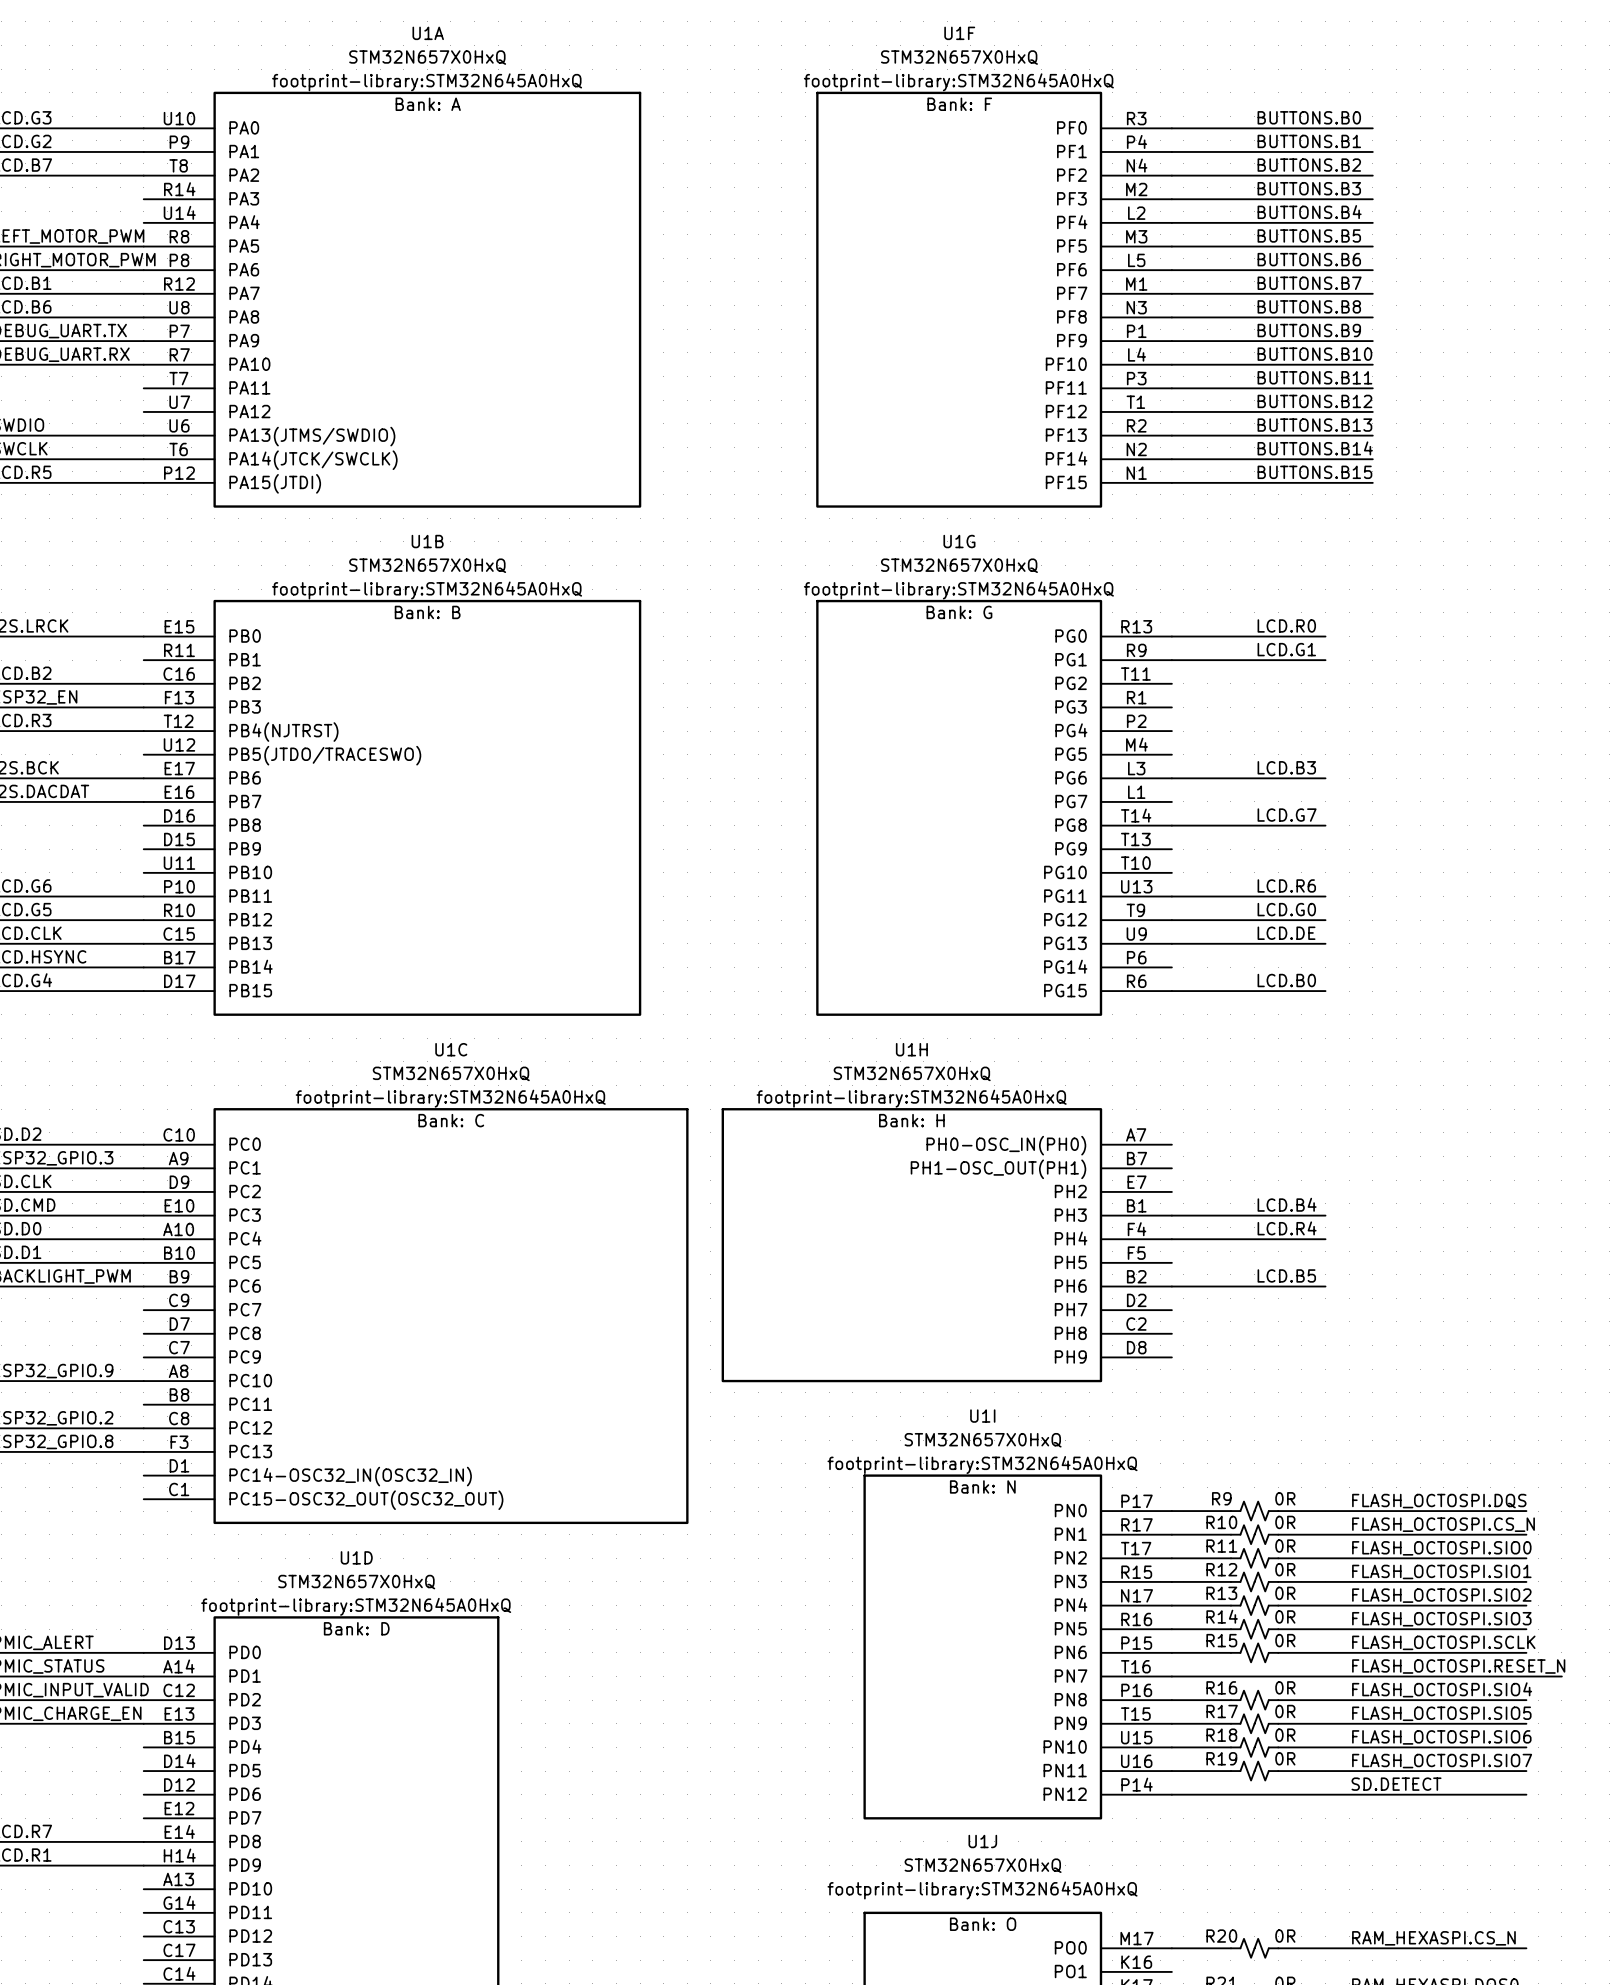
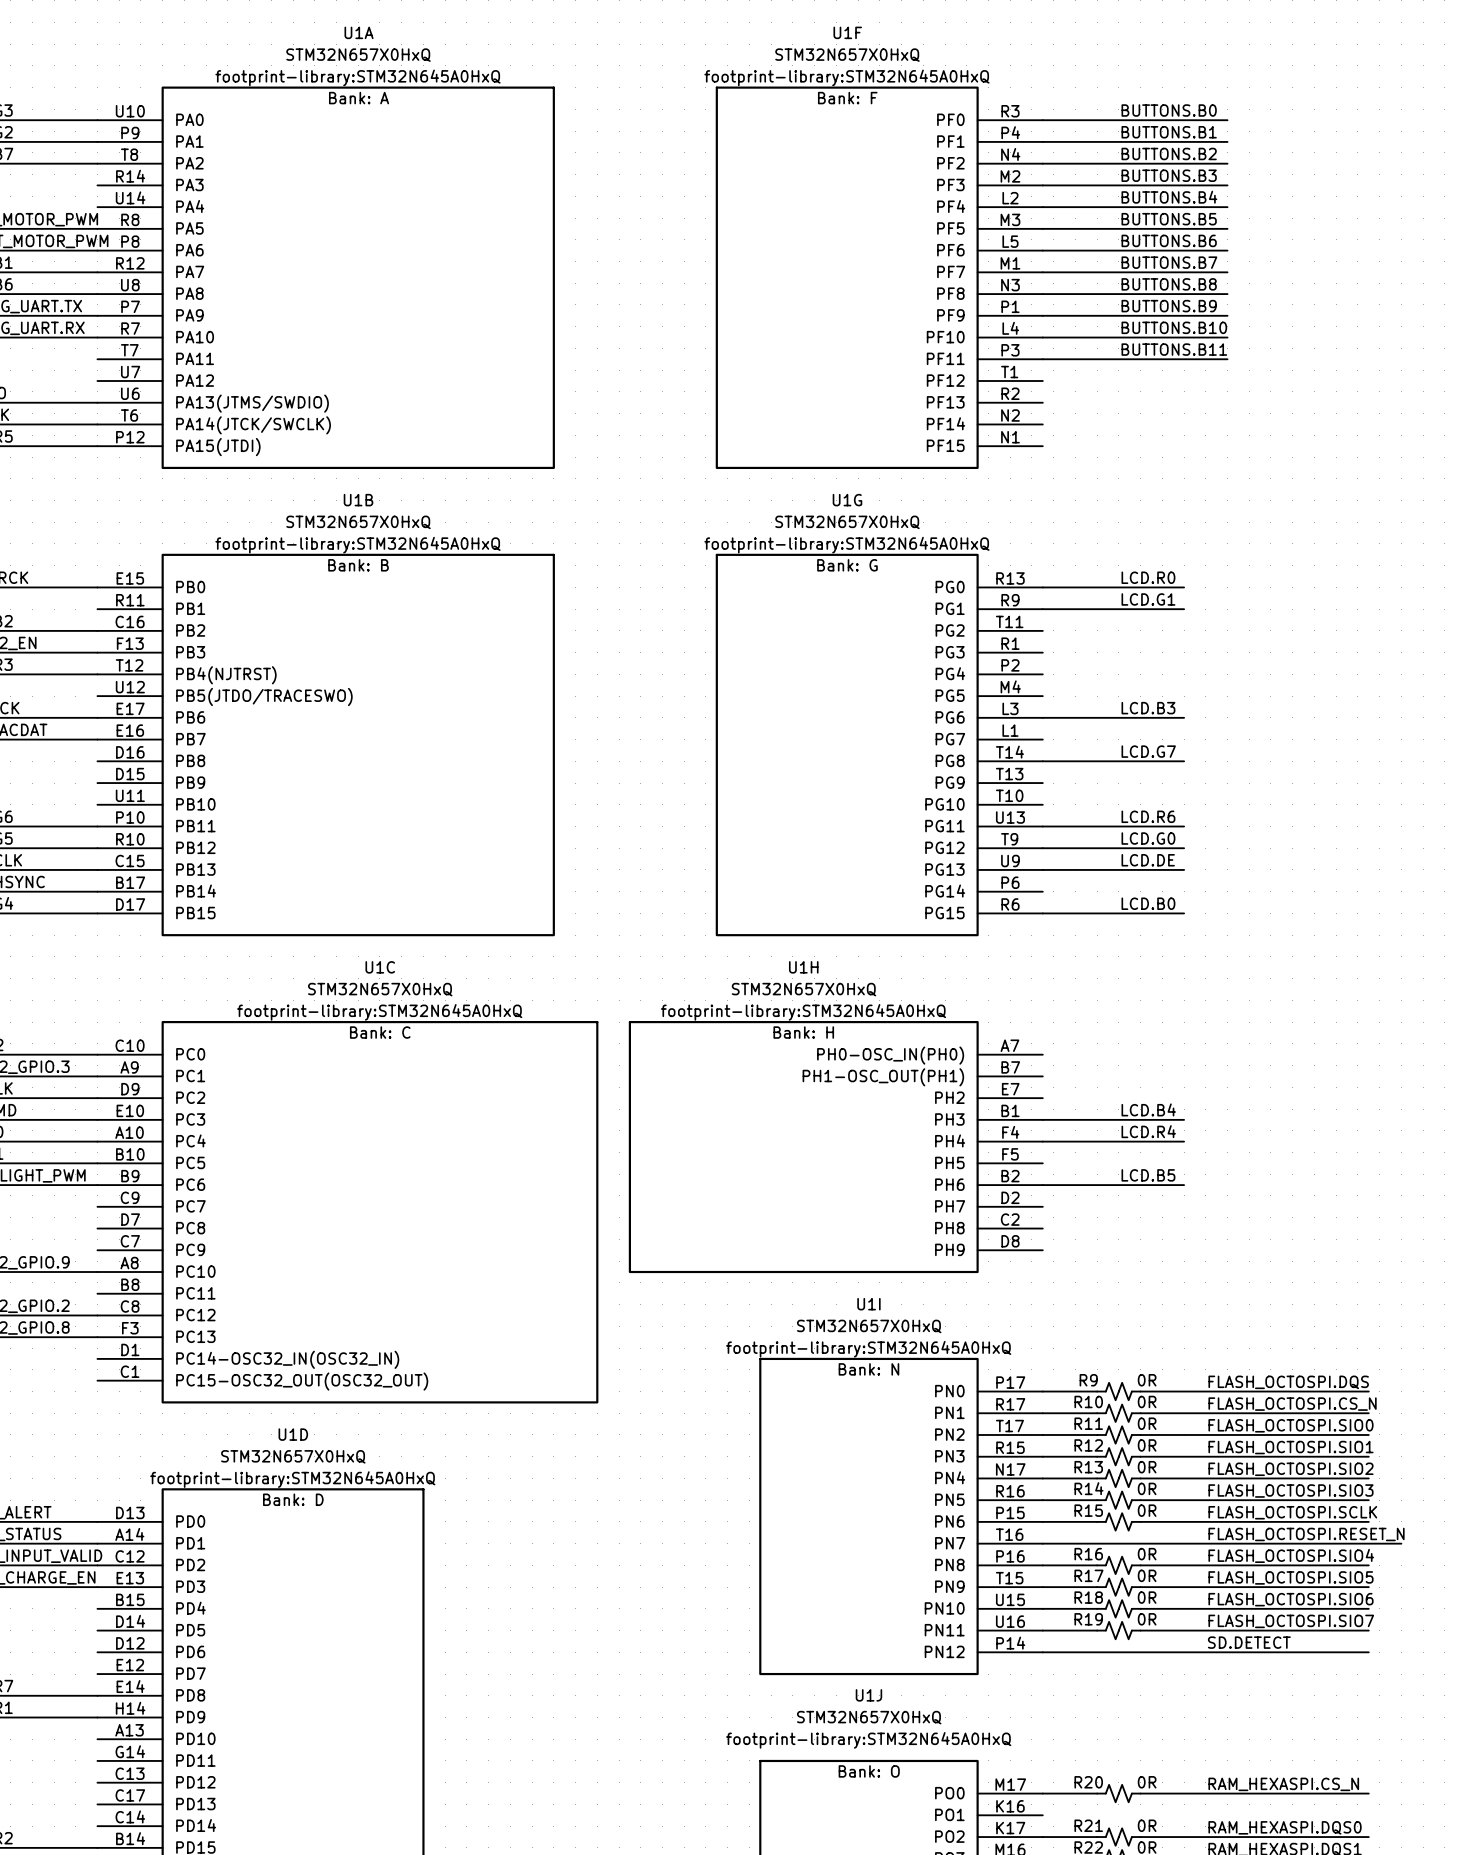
label: BUTTONS.B12 (1314, 401) -> none
wire: (1171, 411) (1372, 411) -> none
label: BUTTONS.B13 (1314, 425) -> none
wire: (1171, 435) (1372, 435) -> none
label: BUTTONS.B14 (1315, 448) -> none
wire: (1171, 459) (1372, 459) -> none
label: BUTTONS.B15 (1314, 472) -> none
wire: (1171, 482) (1372, 482) -> none

